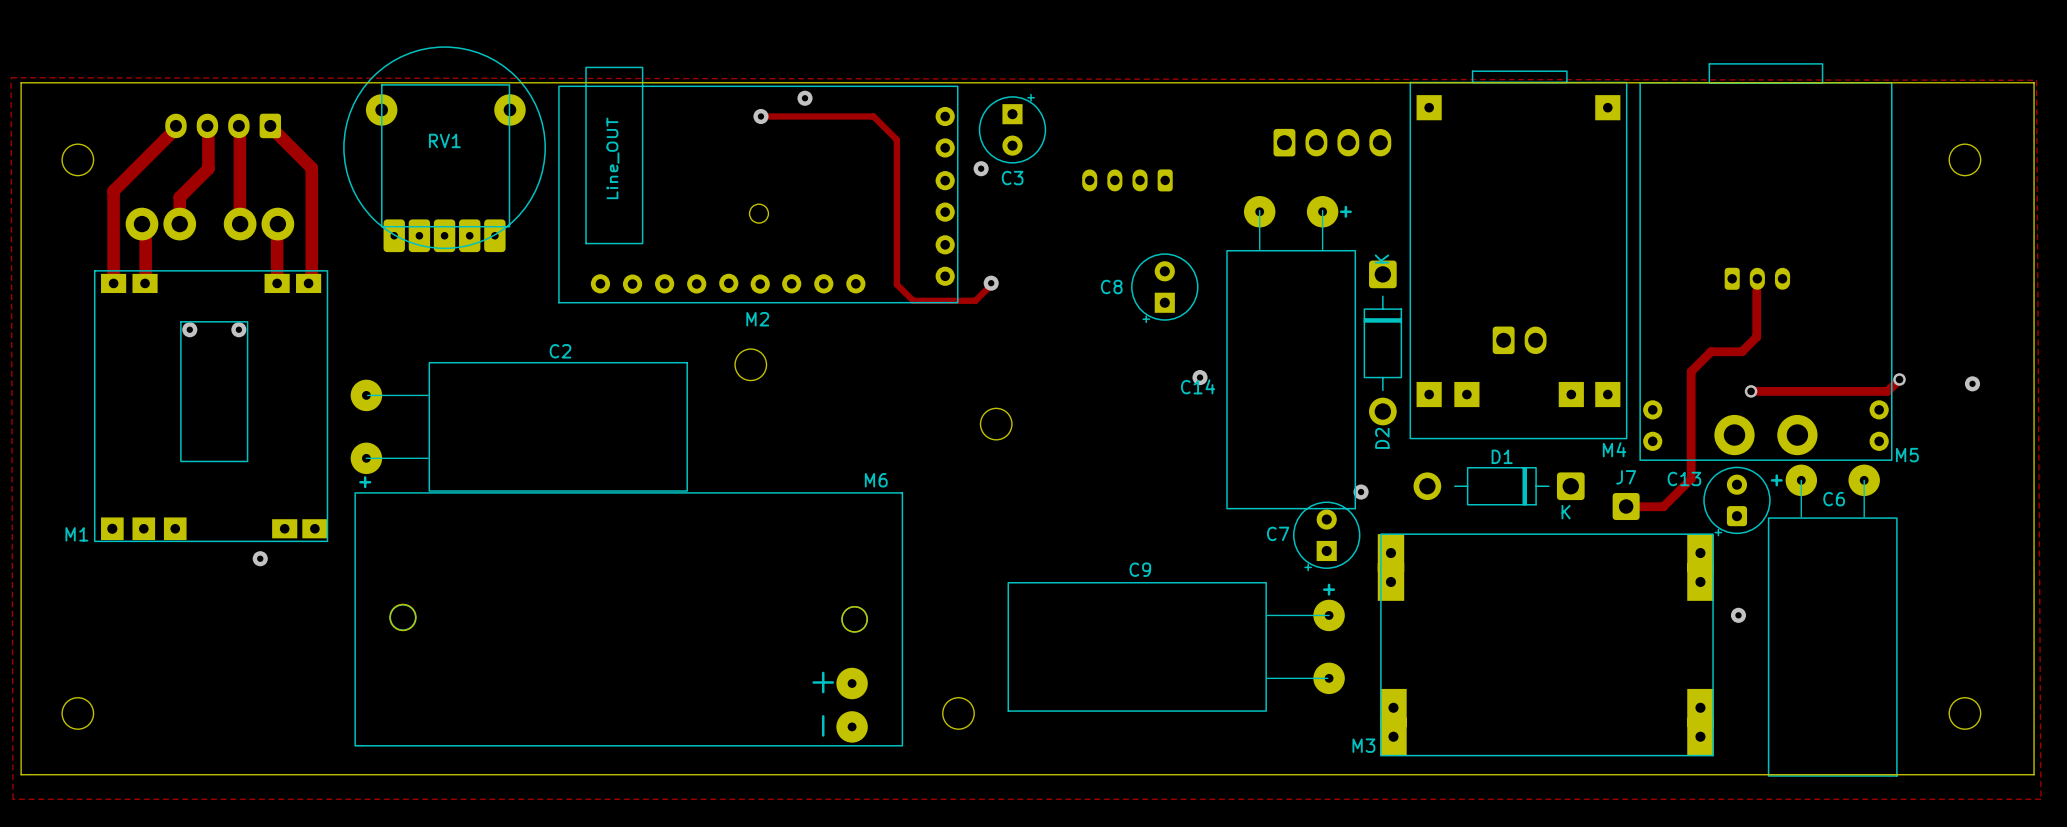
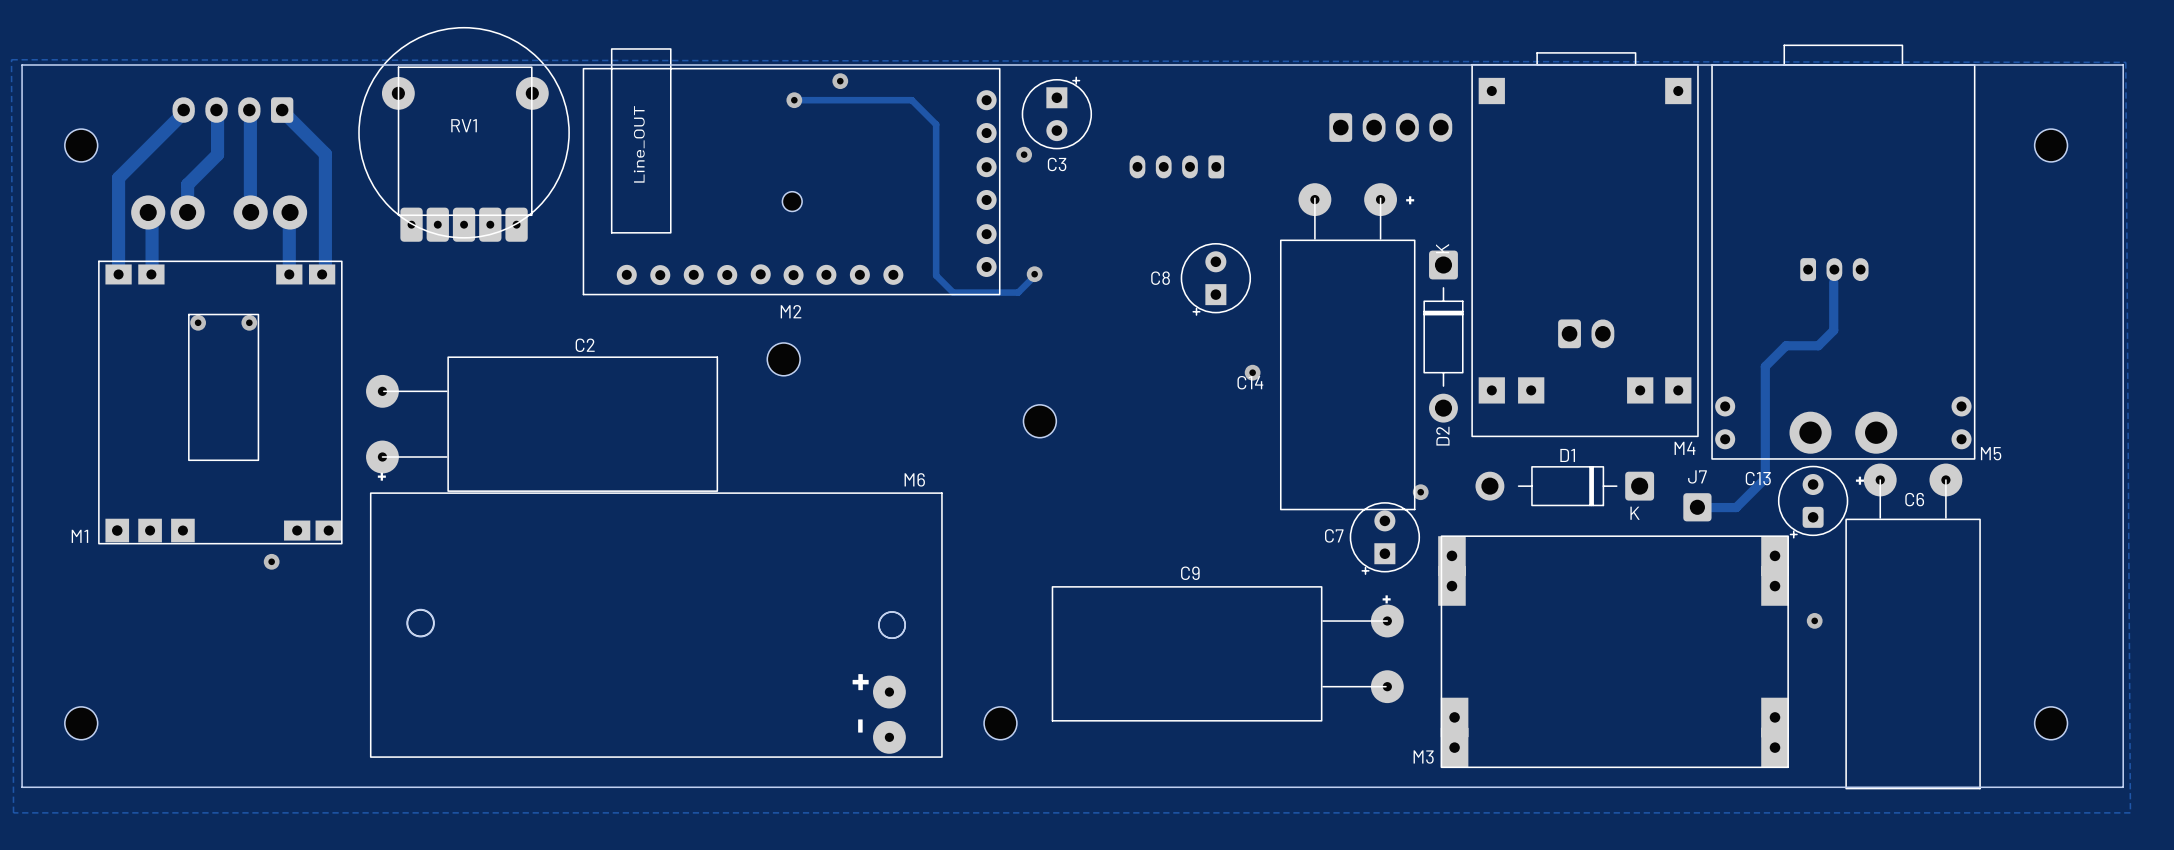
track: (1899, 379) (1887, 391) (1751, 391) -> none
via: (1899, 379) -> none
via: (1972, 383) -> none
via: (1751, 391) -> none

